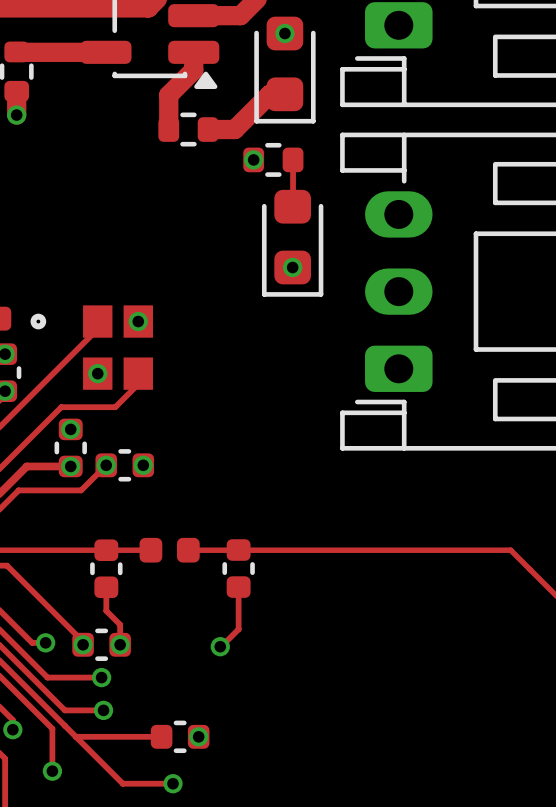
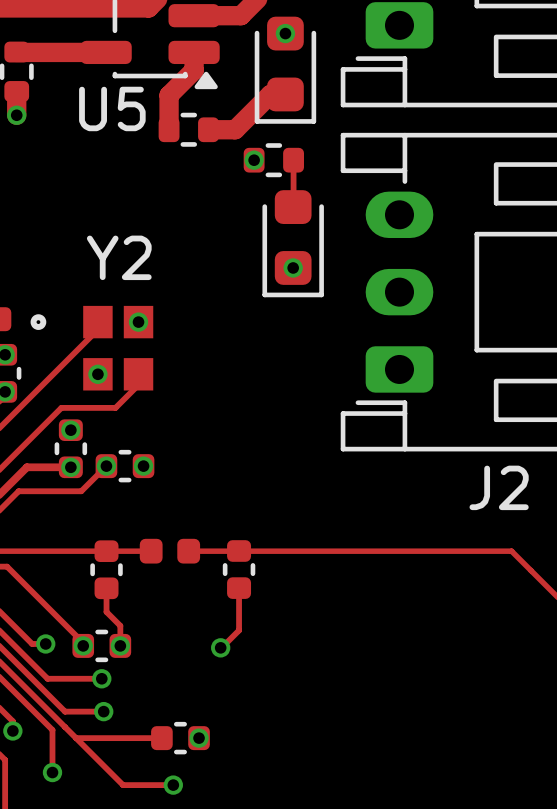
U5 name: none -> U5 (112, 108)
Y2 name: none -> Y2 (119, 257)
J2 name: none -> J2 (499, 487)

